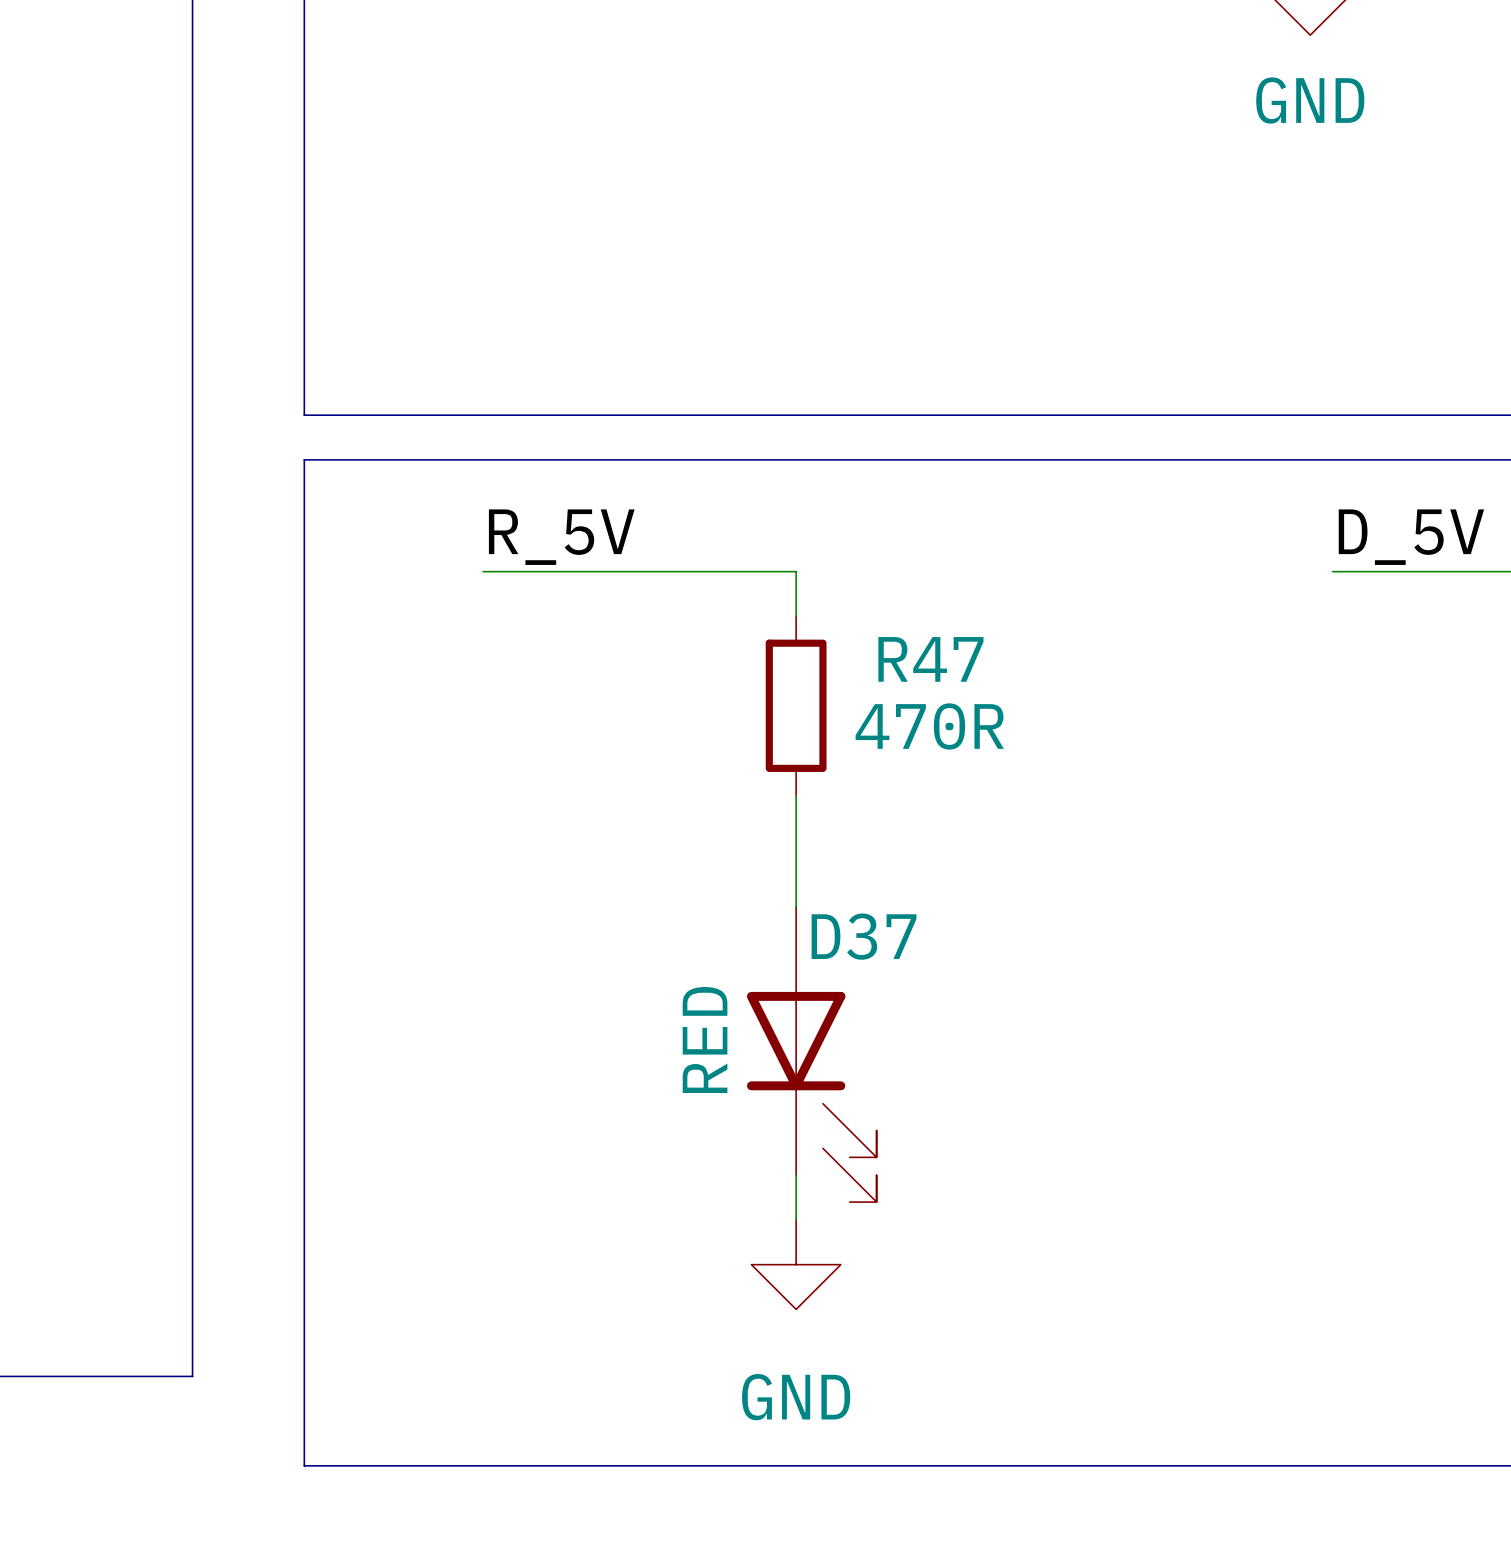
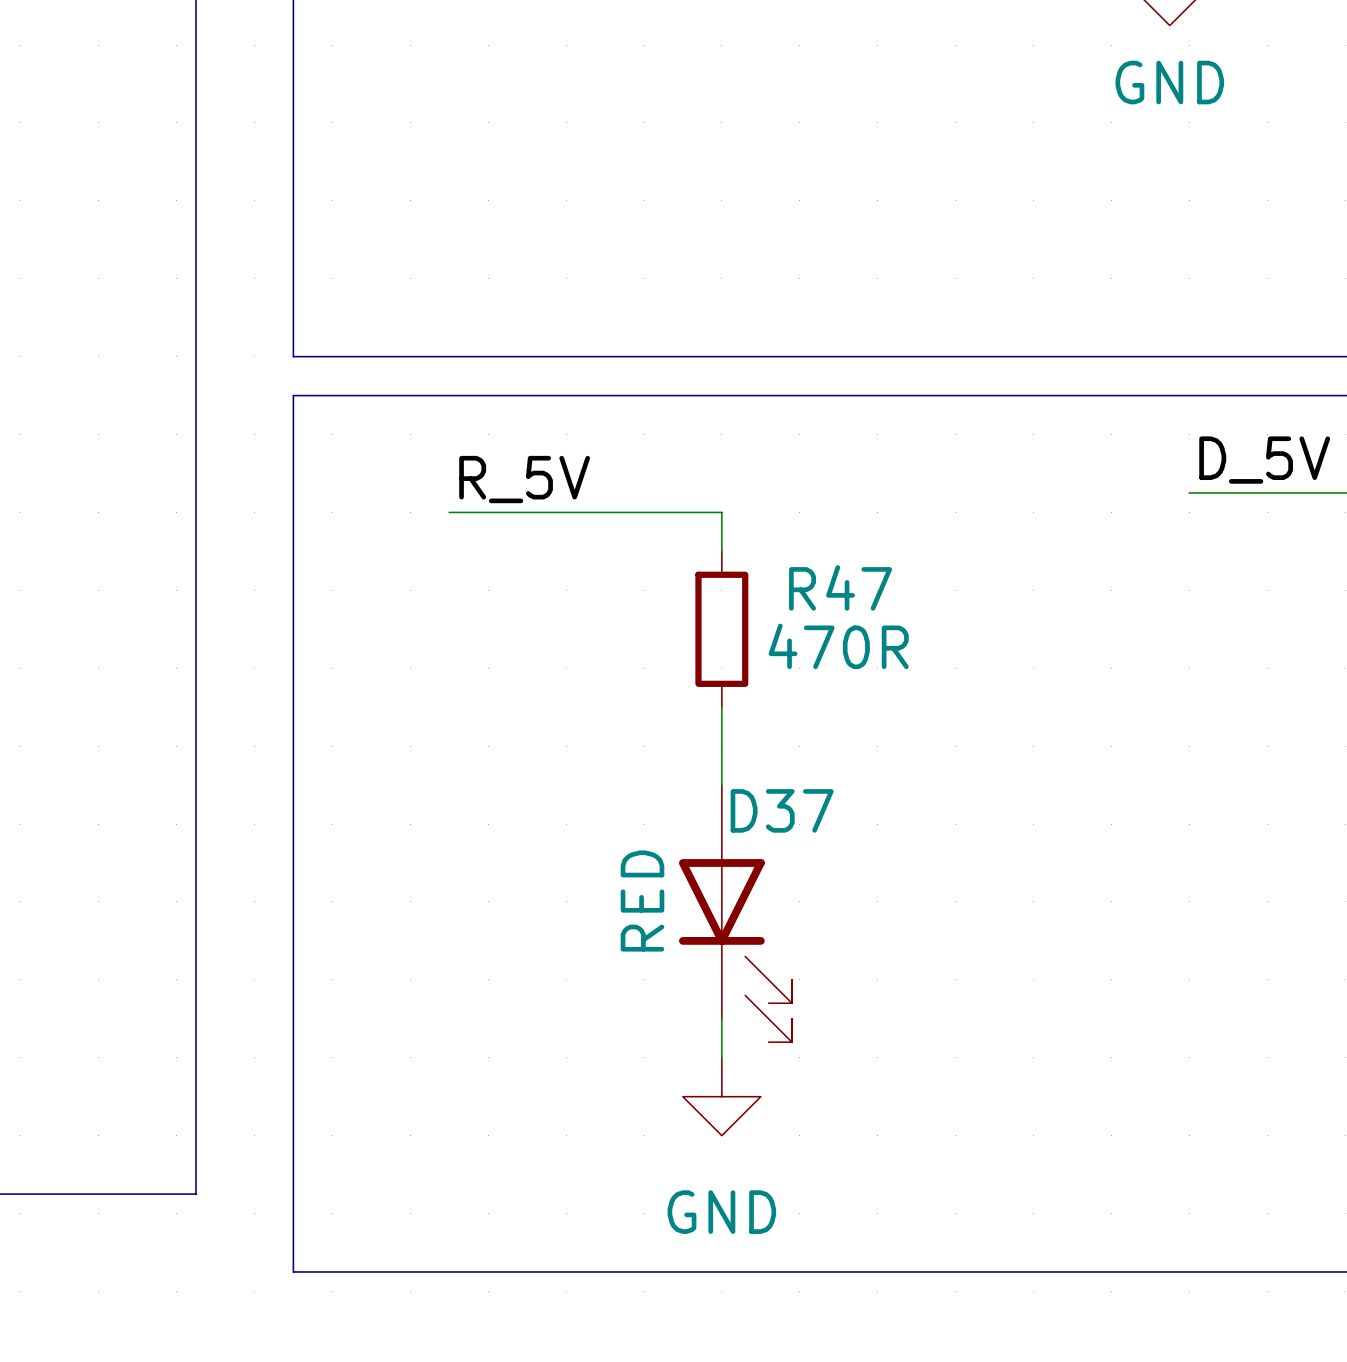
label position: R_5V (561, 537) -> R_5V (524, 479)
wire: (483, 571) (796, 571) (796, 594) -> (449, 512) (721, 512)
R47 position: (796, 705) -> (721, 629)

